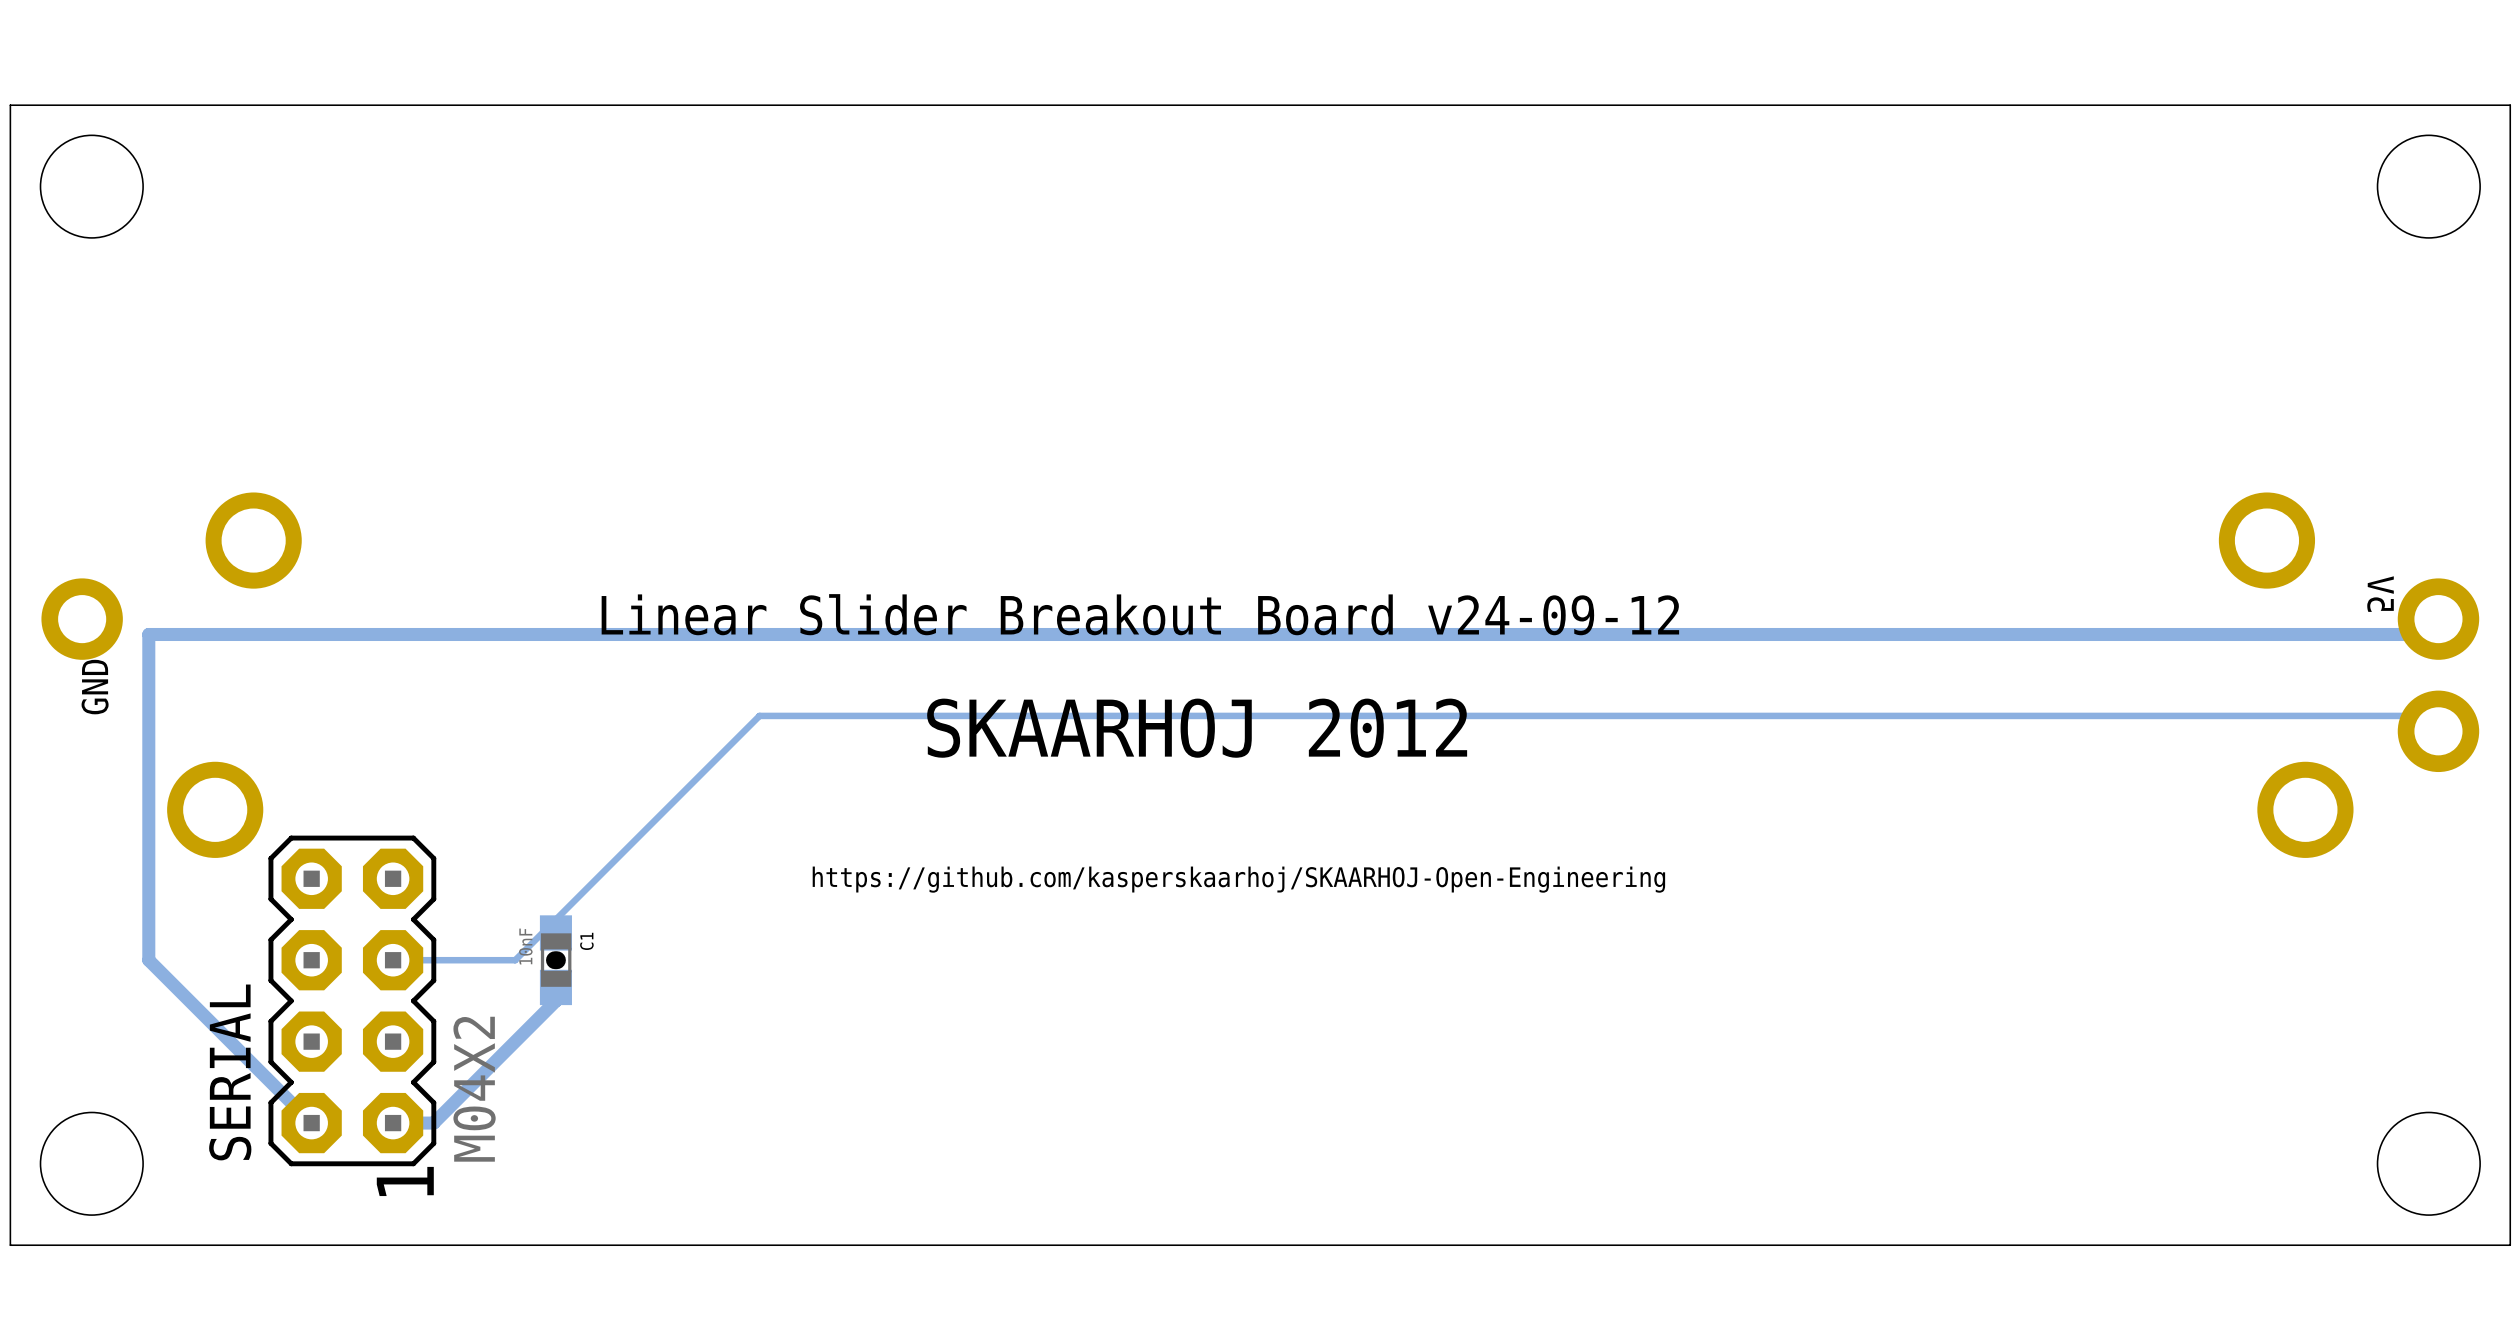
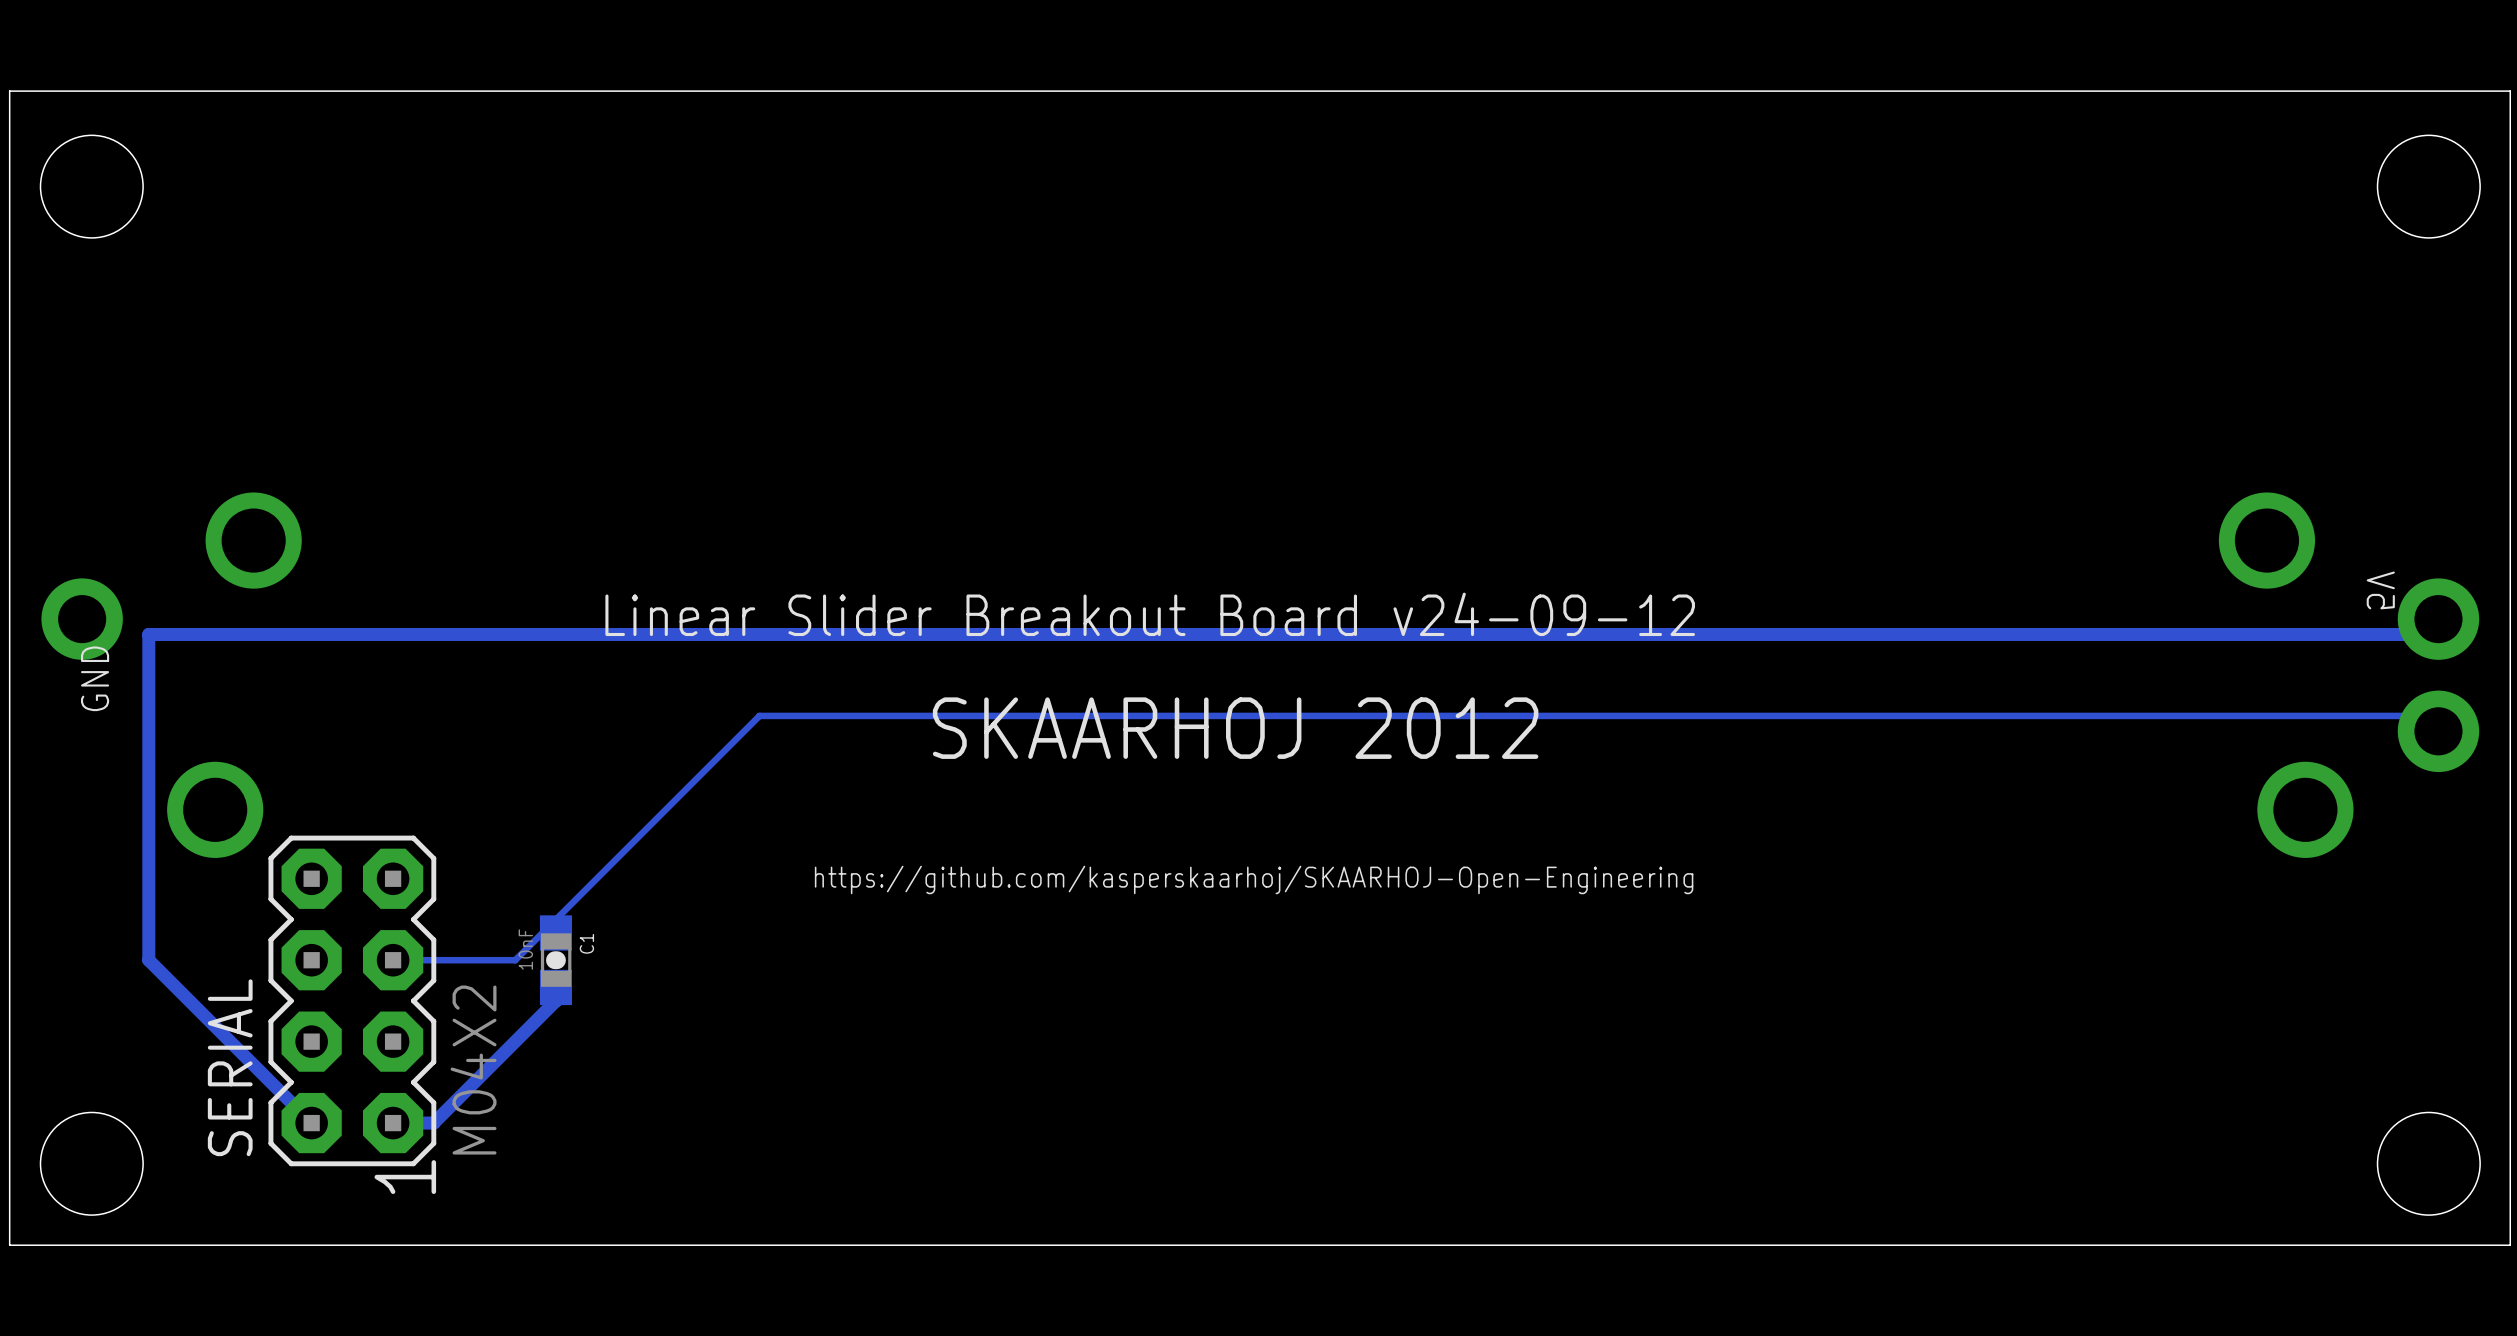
board edge: (2510, 105) (10, 105) (10, 1245) -> (2510, 105) (2510, 91) (9, 91) (10, 1245)

